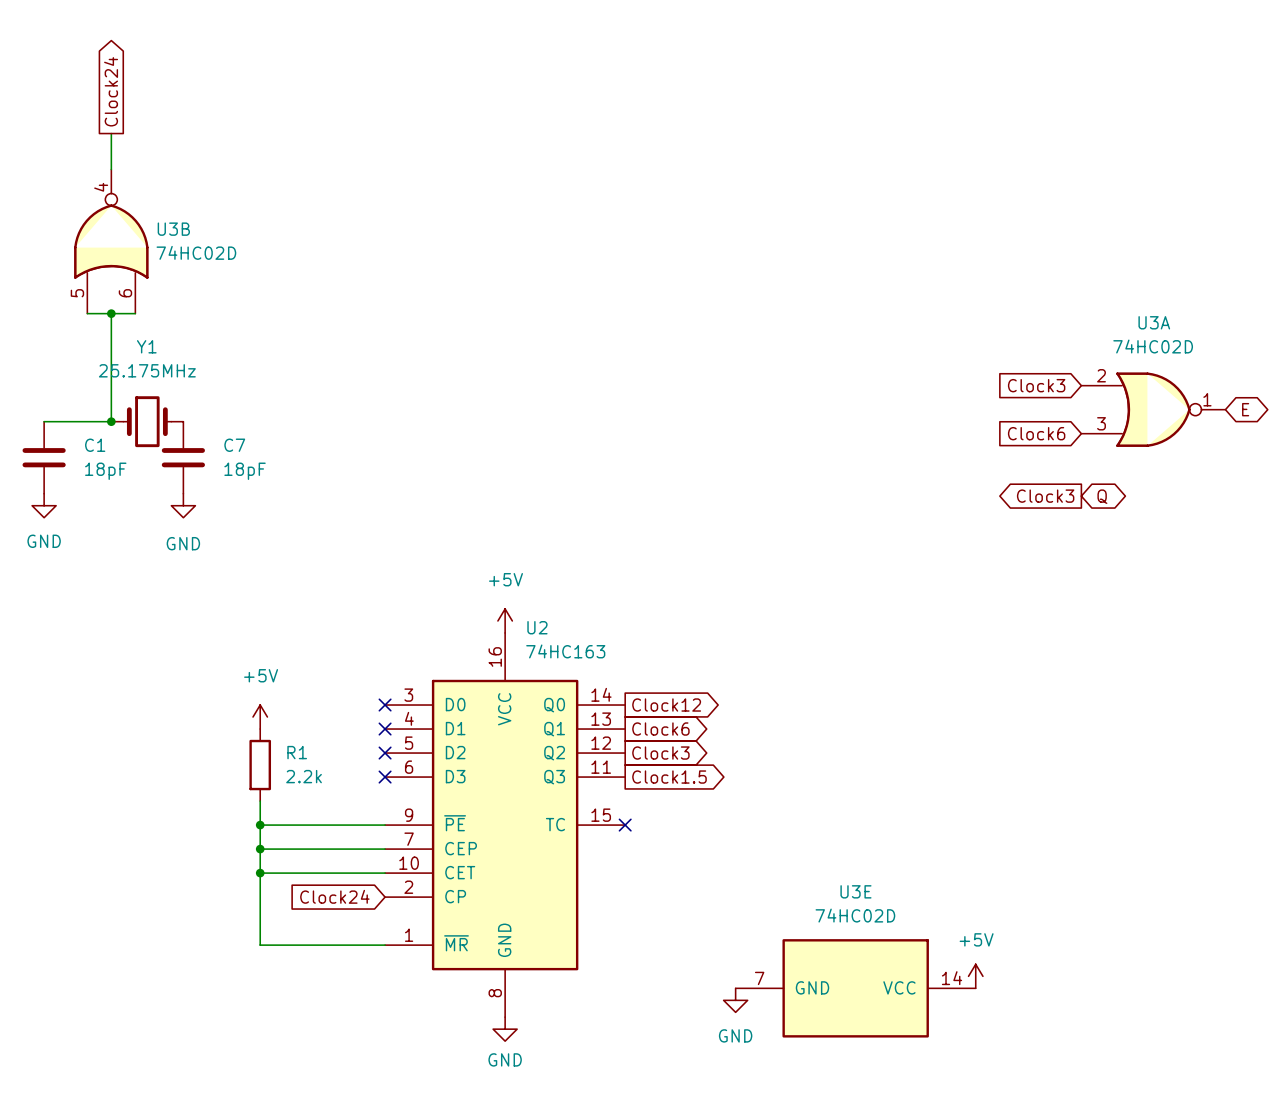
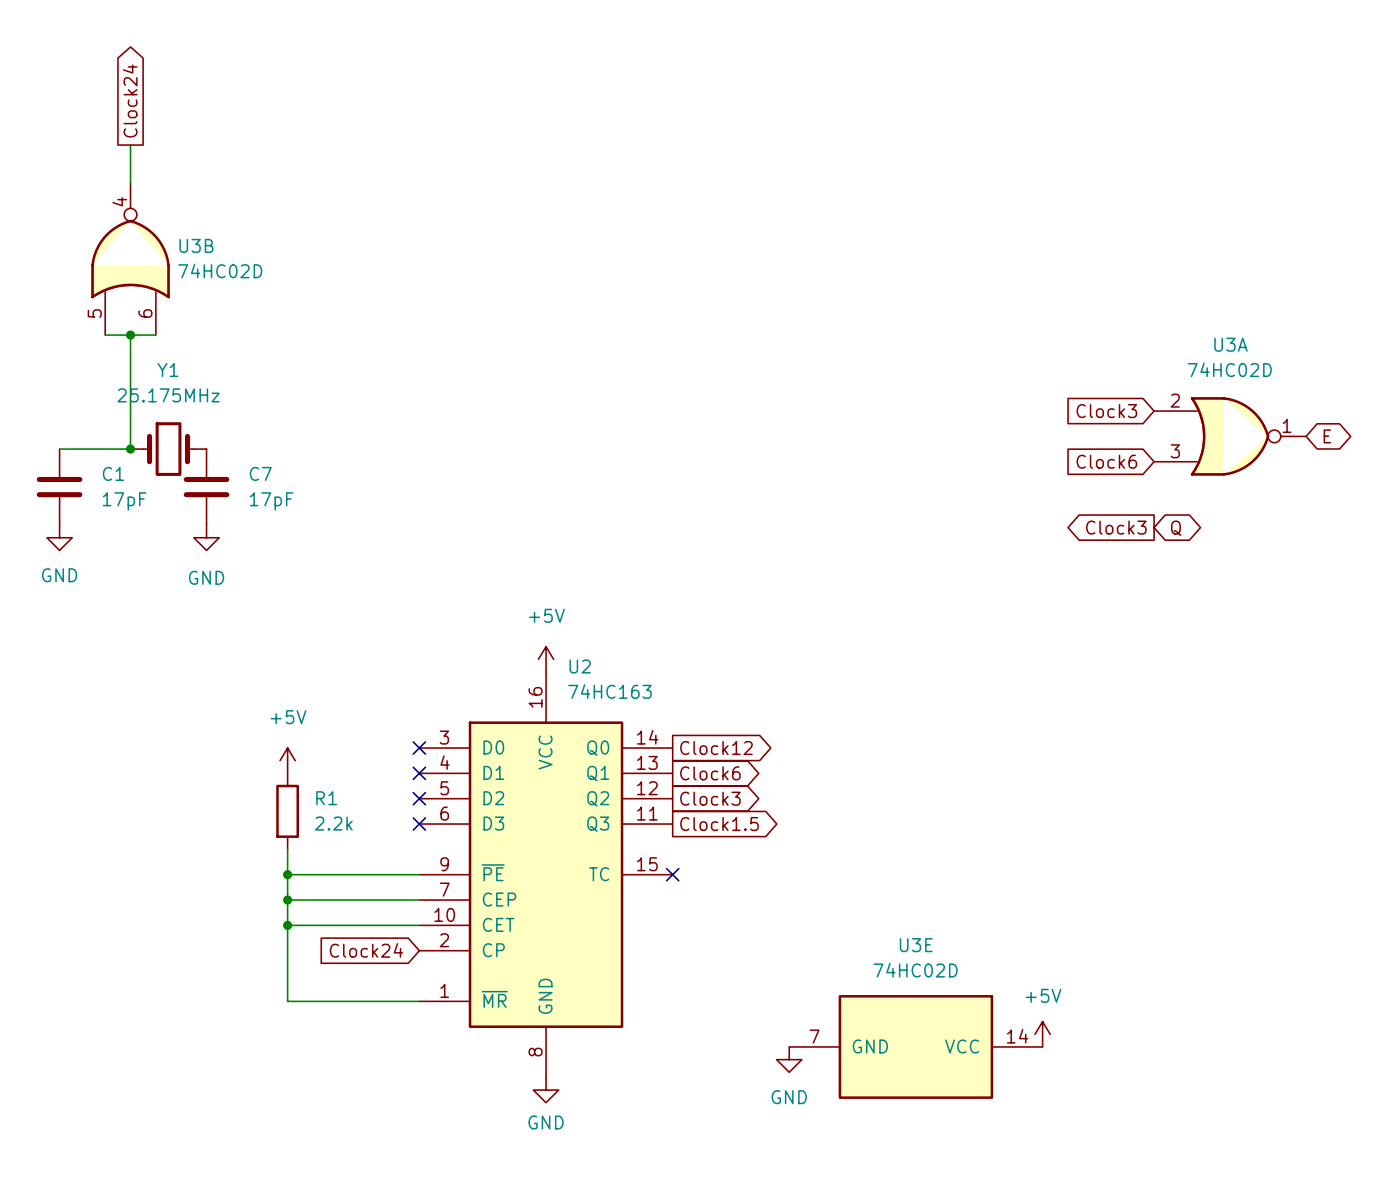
C1 value: 18pF (105, 471) -> 17pF (124, 501)
C7 value: 18pF (245, 471) -> 17pF (271, 501)

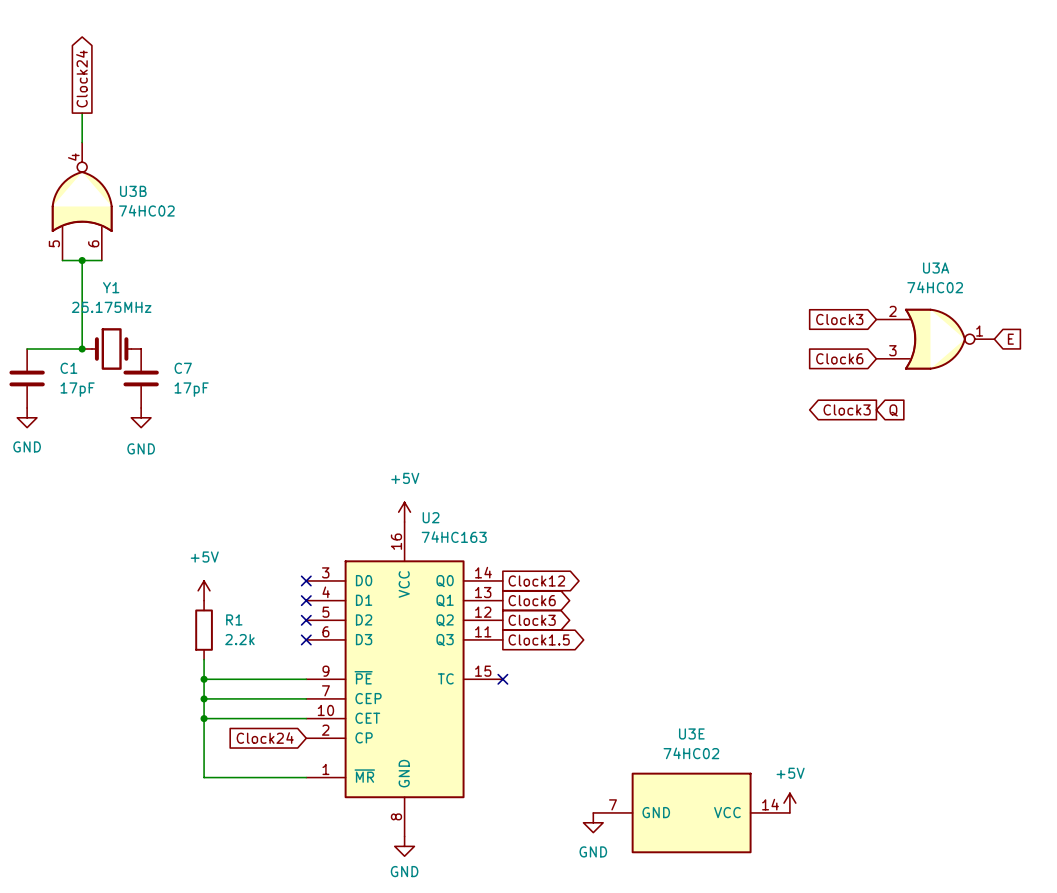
U3B value: 74HC02D (220, 270) -> 74HC02 (146, 210)
U3A value: 74HC02D (1229, 369) -> 74HC02 (935, 287)
global label shape: bidirectional (1327, 436) -> input (1010, 339)
global label shape: bidirectional (1176, 528) -> input (893, 410)
U3E value: 74HC02D (915, 970) -> 74HC02 (691, 753)

